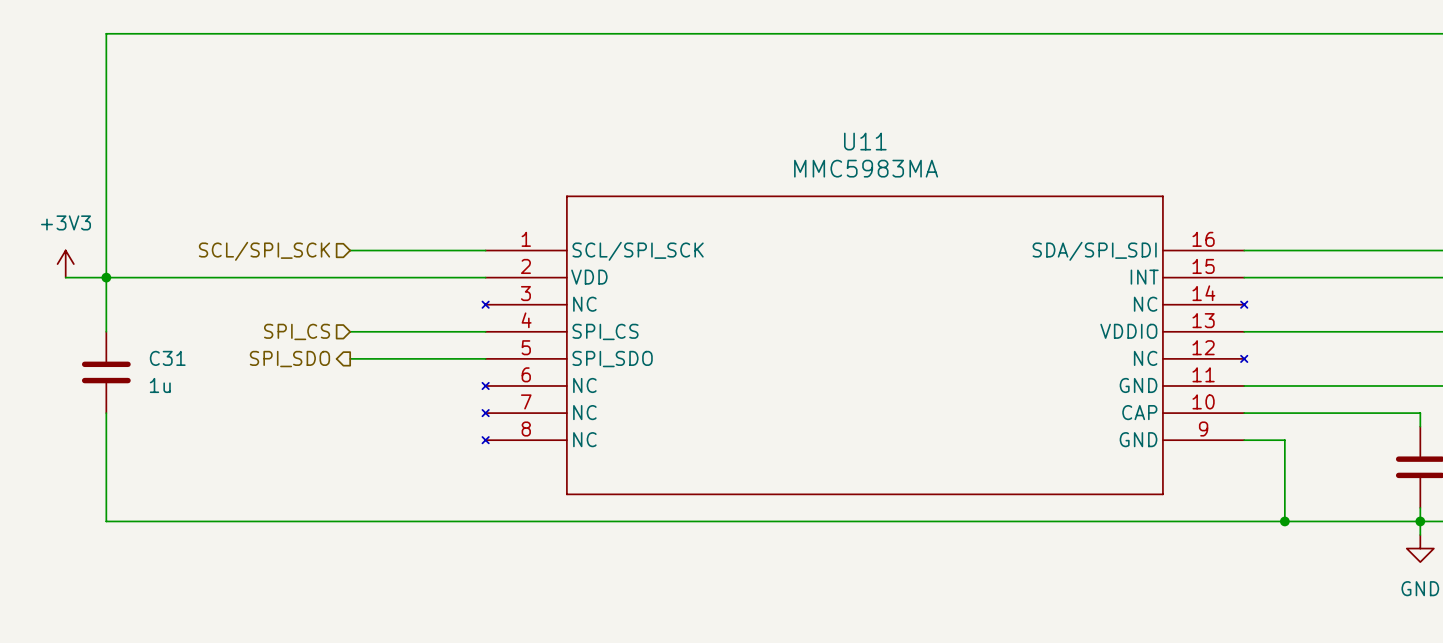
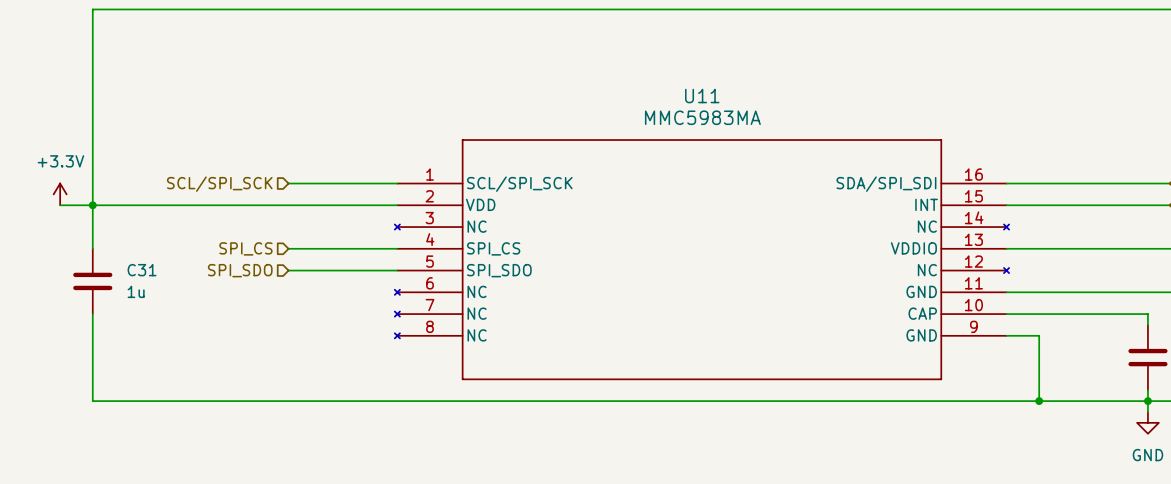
power symbol: +3V3 (65, 264) -> +3.3V (60, 194)
hierarchical label shape: output (289, 359) -> input (240, 270)

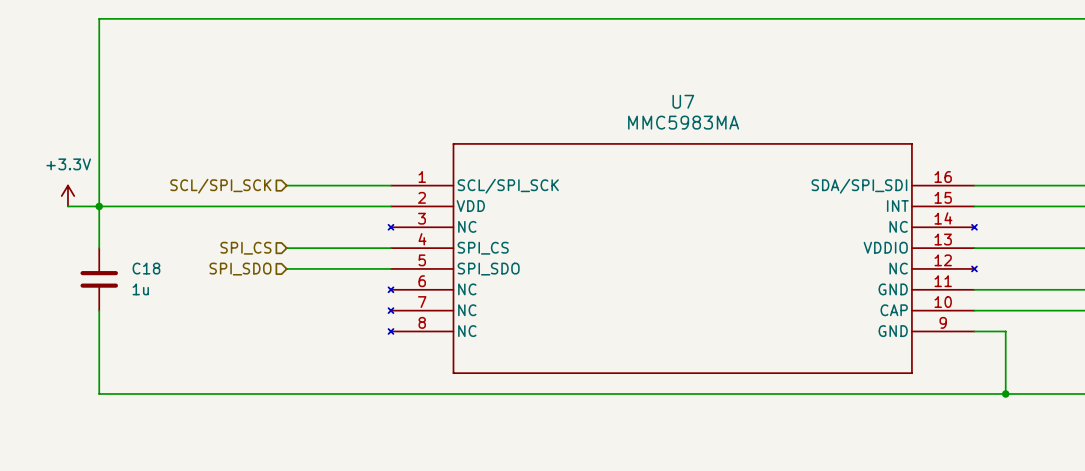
U11 name: U11 (702, 96) -> U7 (683, 101)
C31 name: C31 (142, 270) -> C18 (146, 268)

